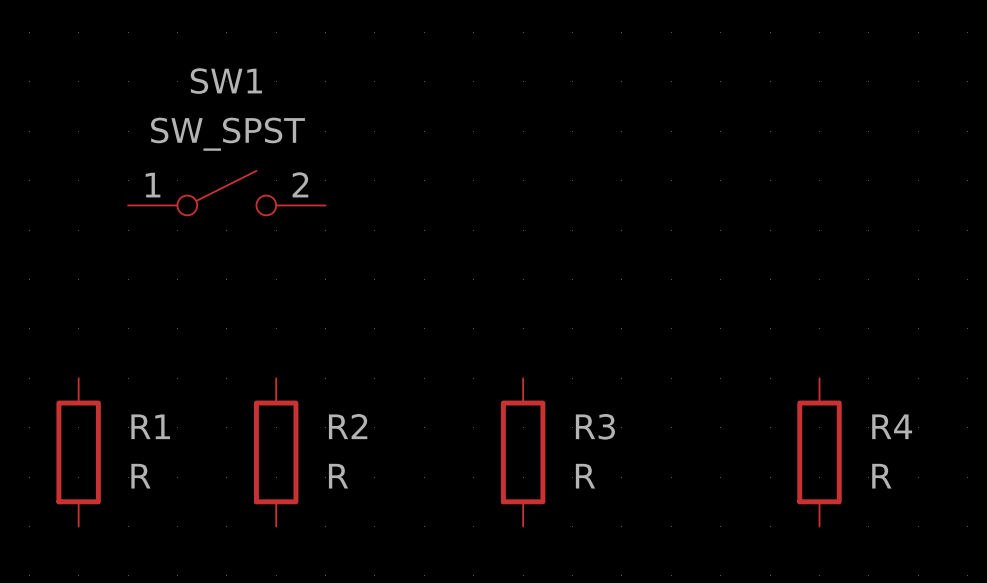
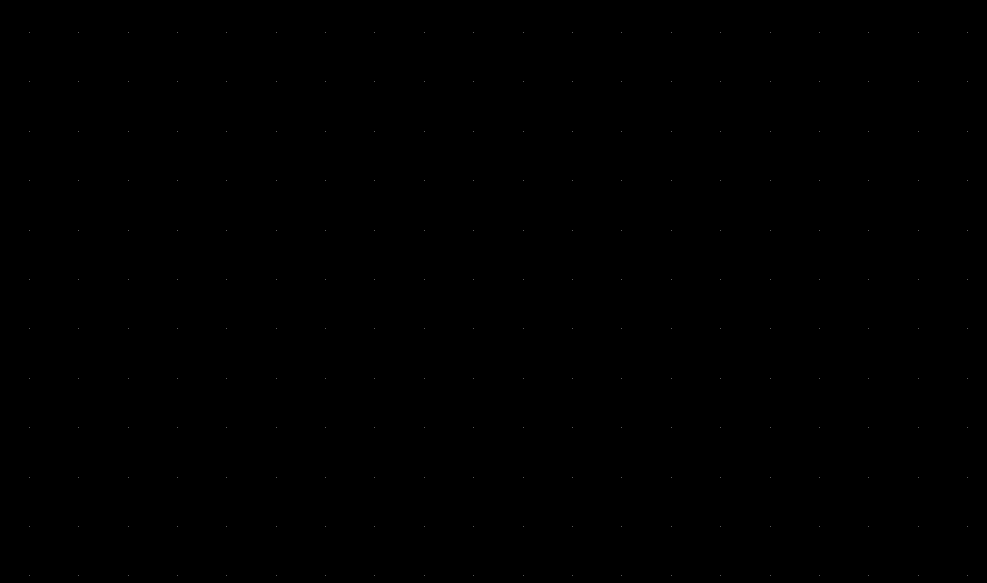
SW1: SW_SPST (226, 193) -> none
R1: R (78, 452) -> none
R2: R (276, 452) -> none
R3: R (523, 452) -> none
R4: R (819, 452) -> none

